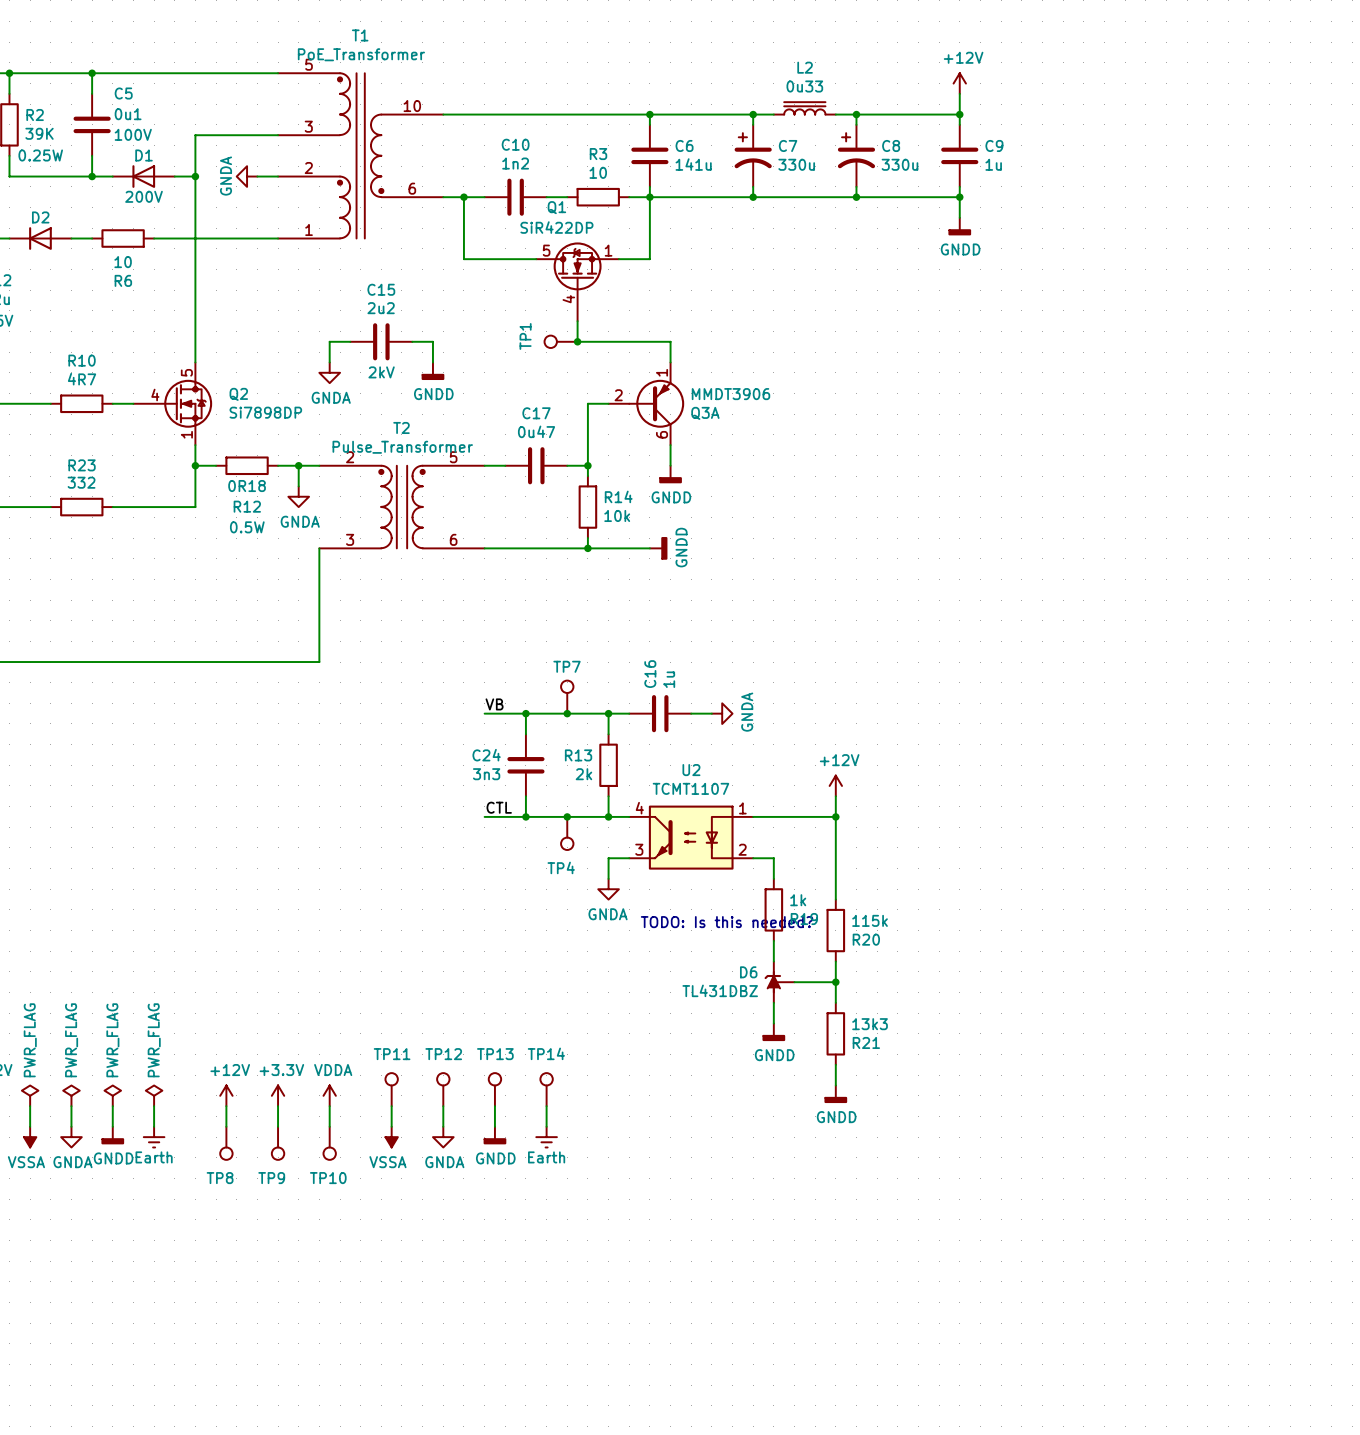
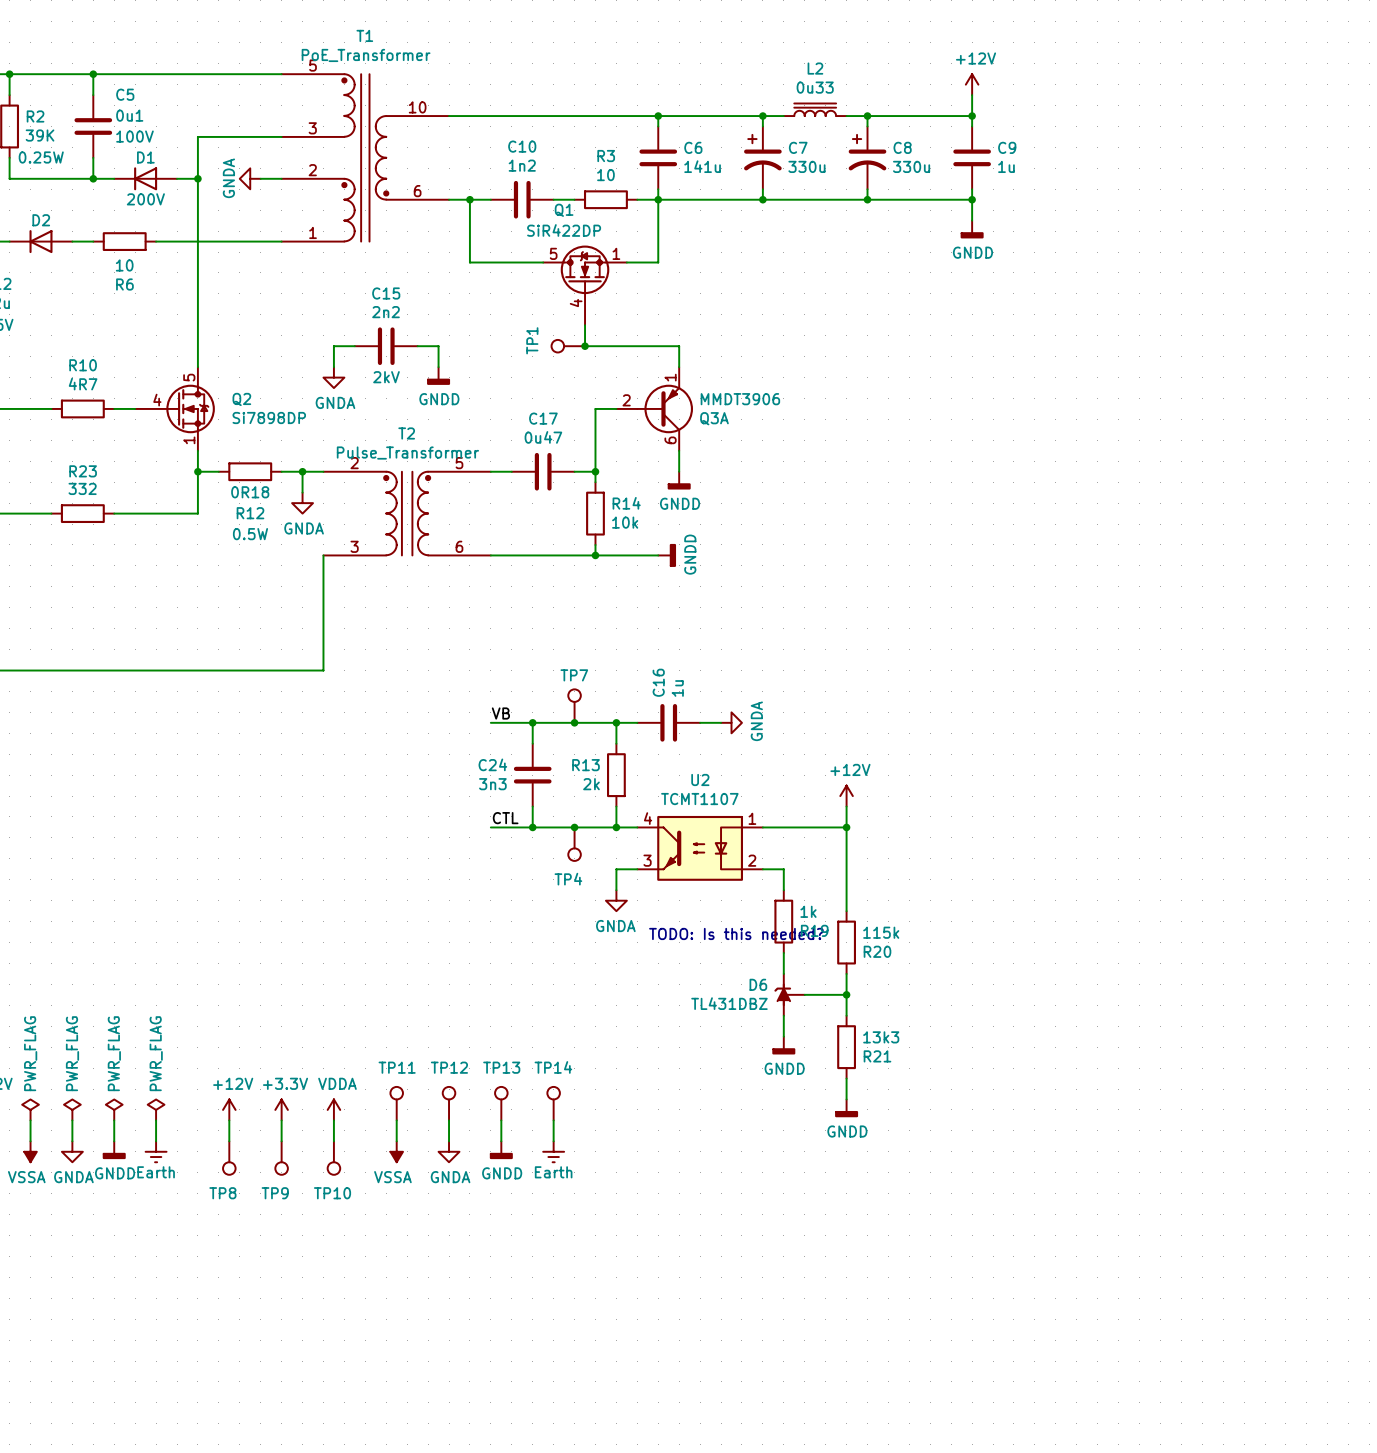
C15 value: 2u2 (381, 308) -> 2n2 (385, 312)

